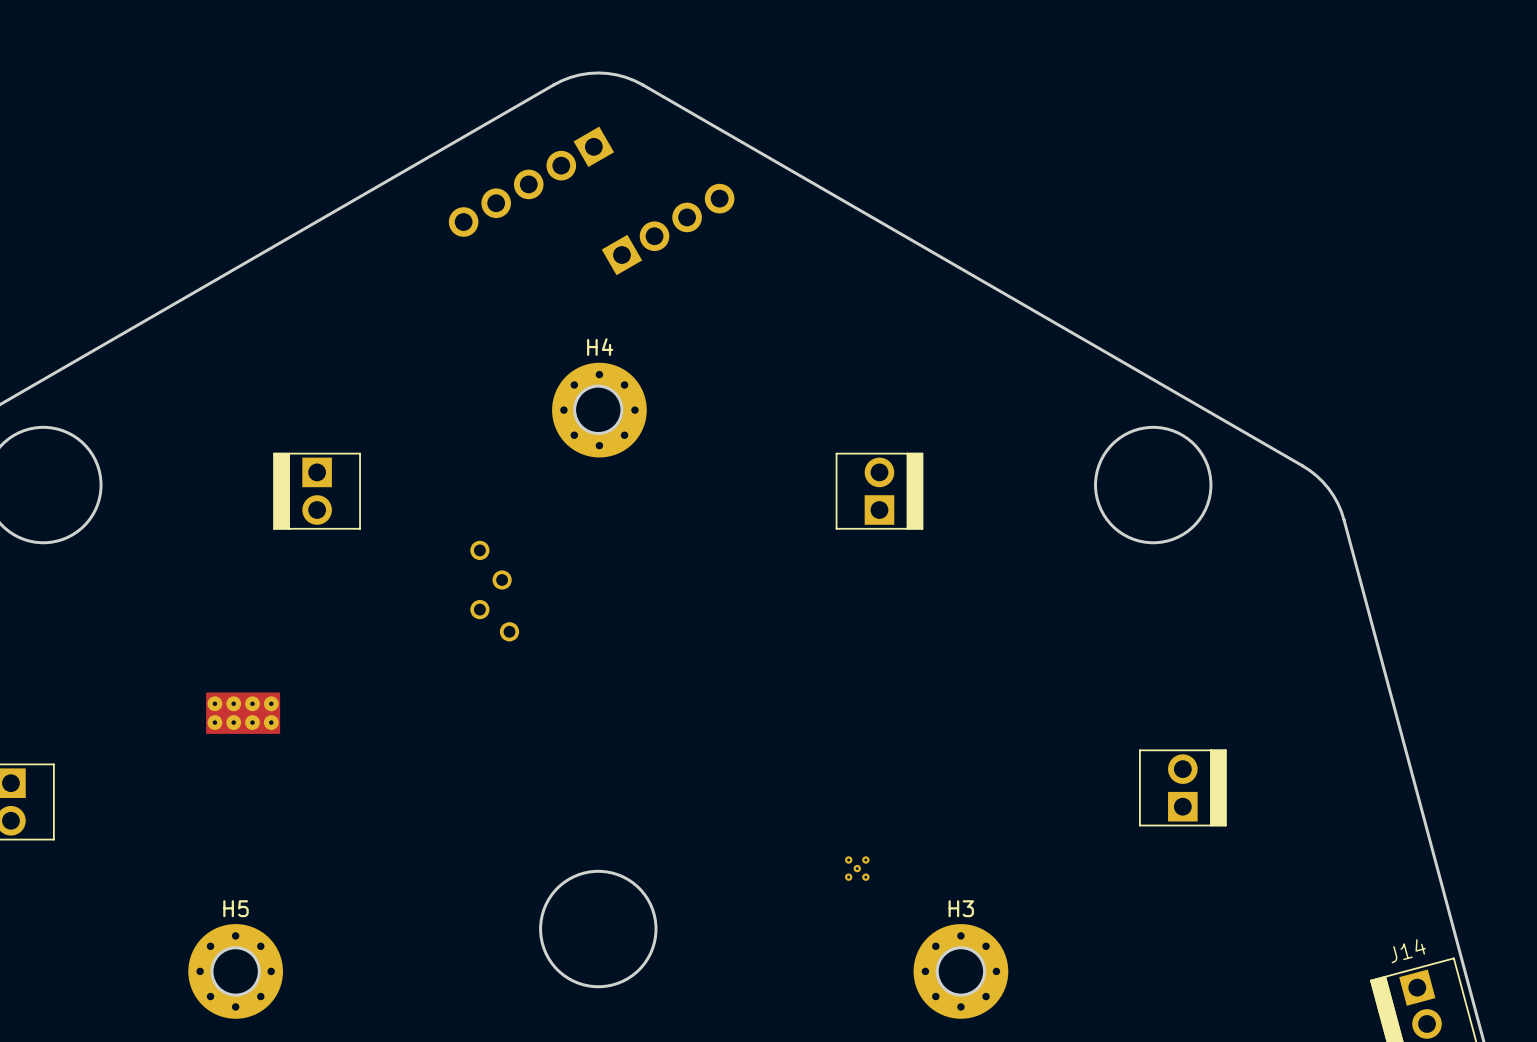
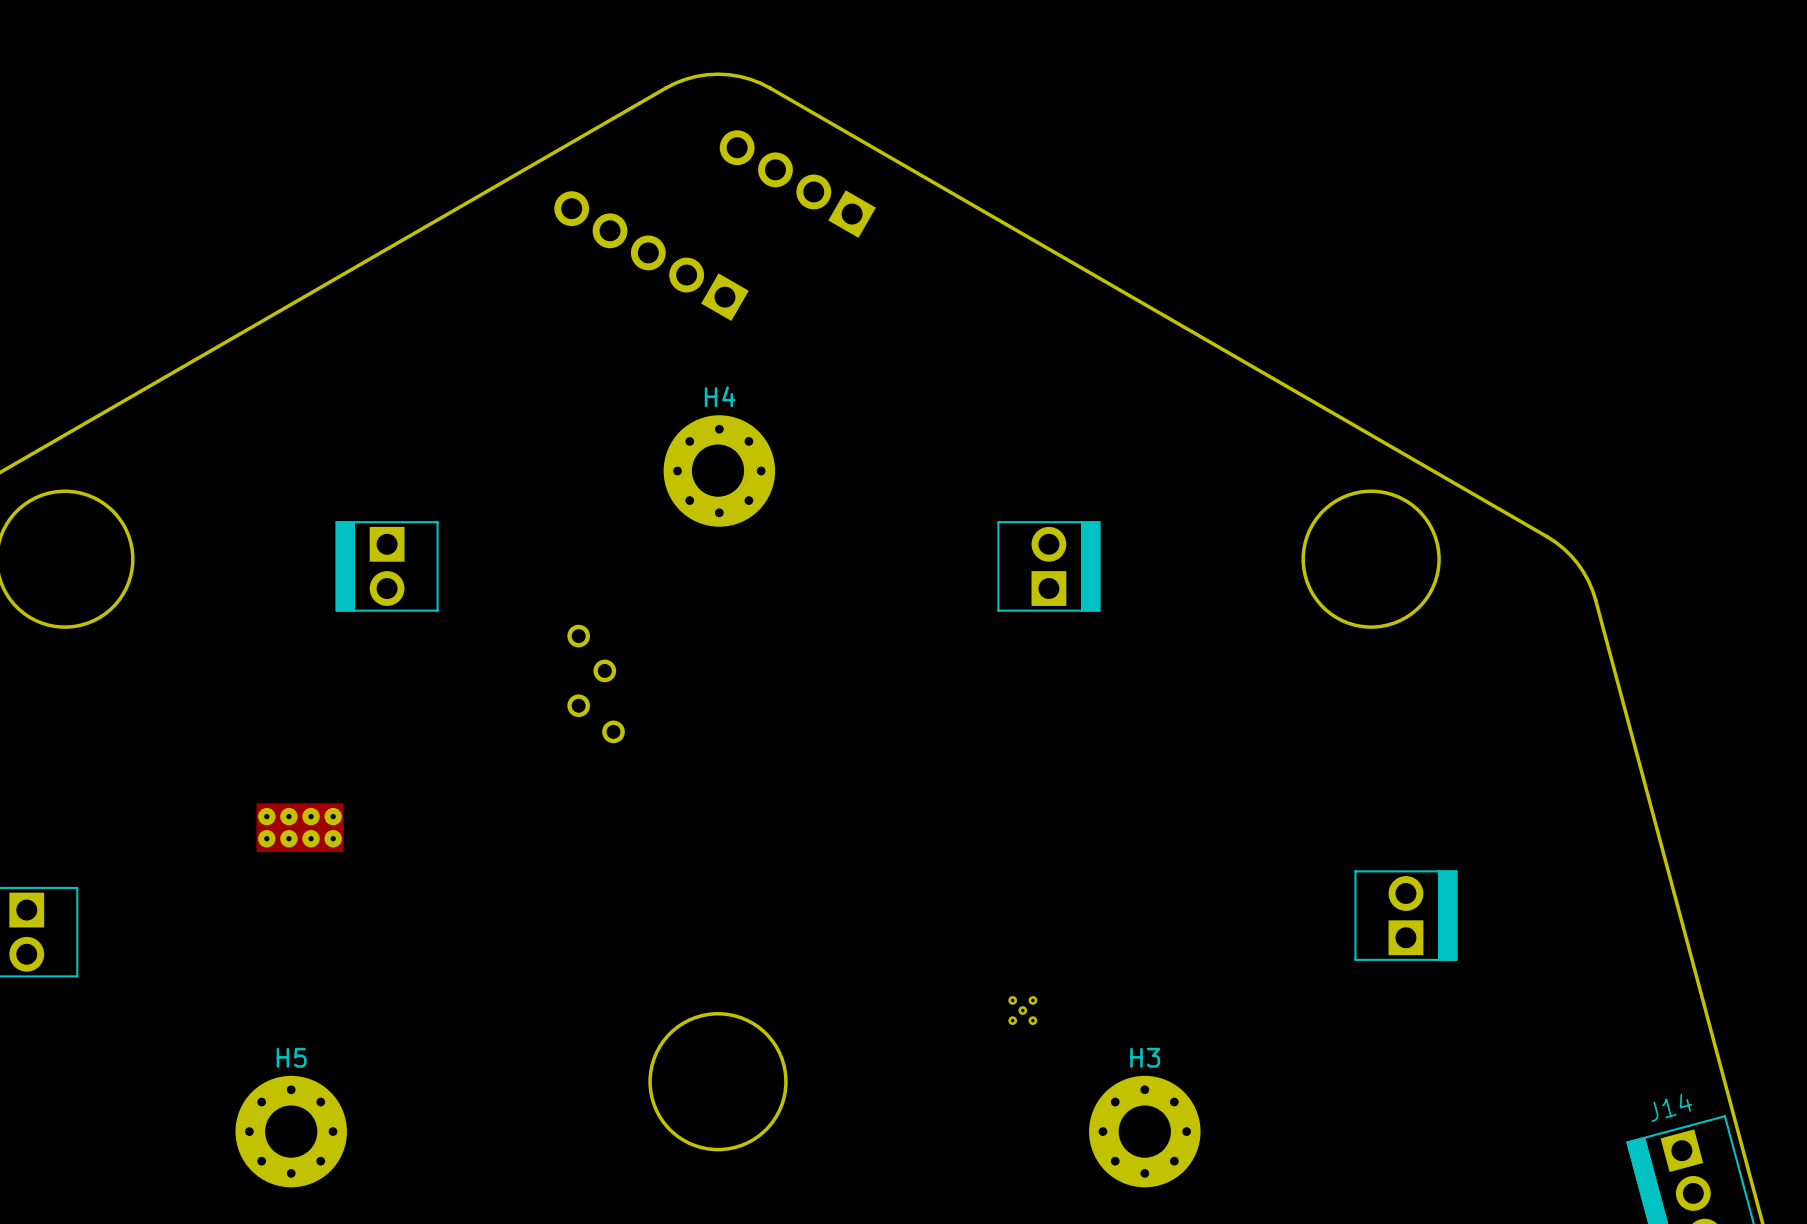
part: none -> (797, 184)
part: (531, 181) -> none
part: none -> (651, 256)
part: (668, 229) -> none

